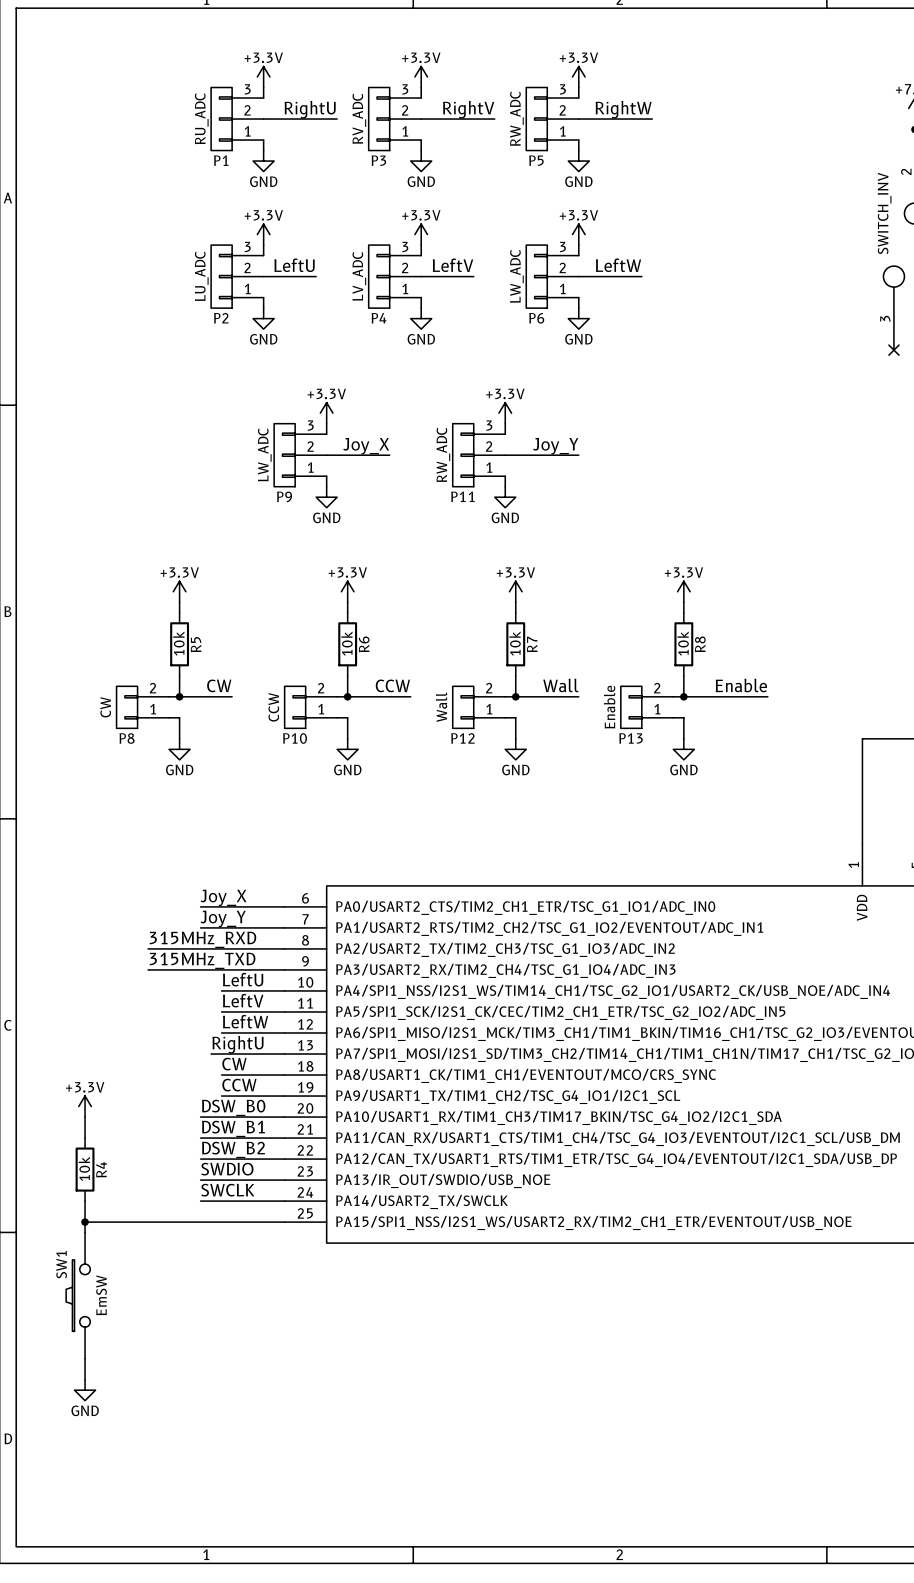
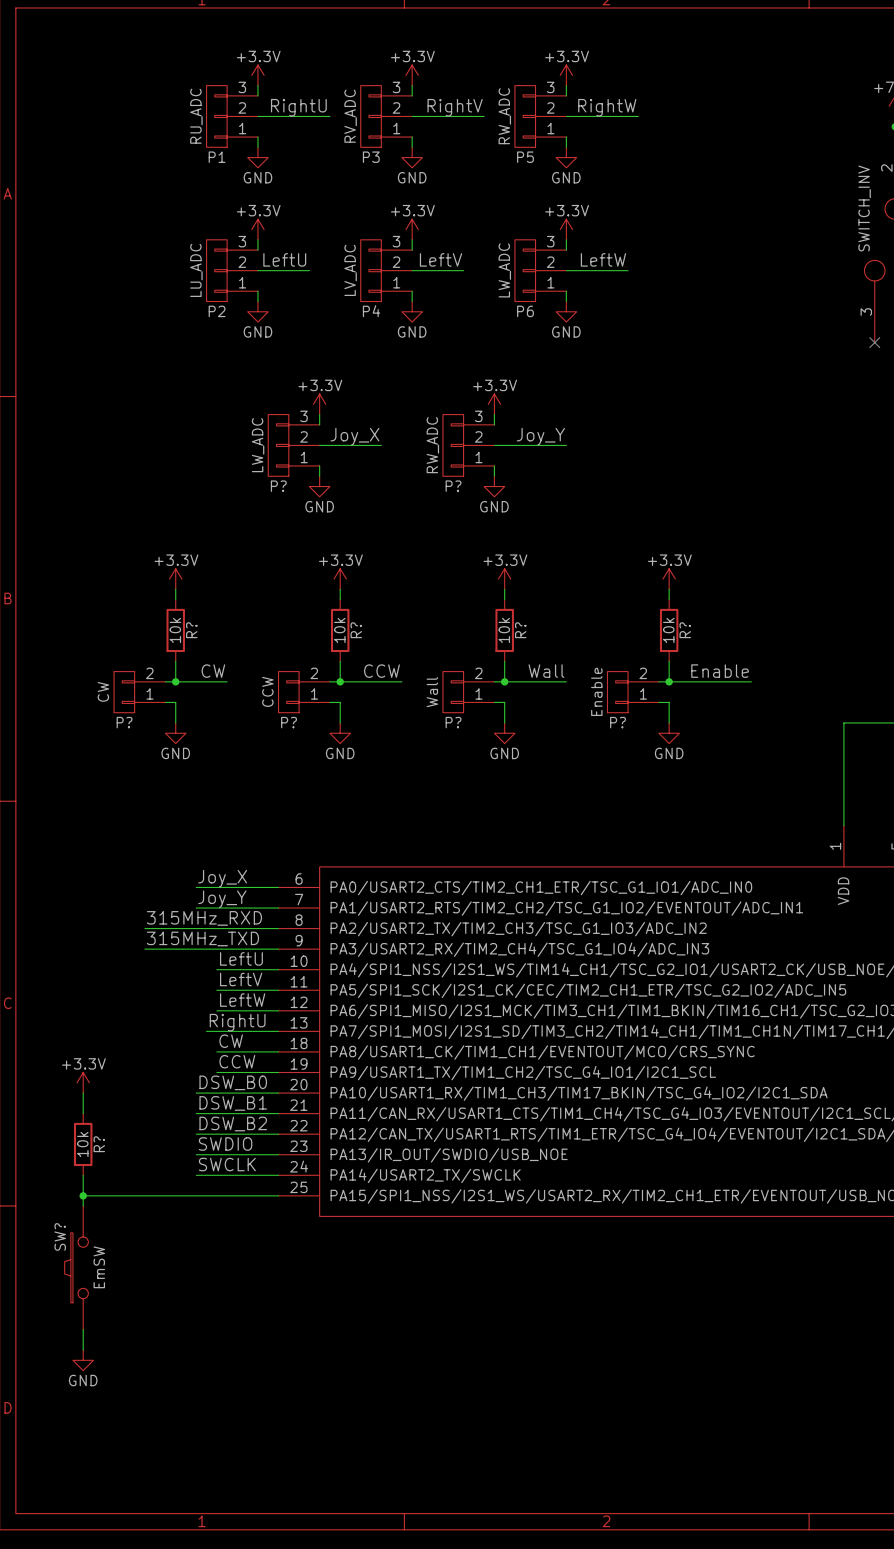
P9 name: P9 (284, 496) -> P? (278, 486)
P11 name: P11 (462, 496) -> P? (453, 486)
R5 name: R5 (196, 644) -> R? (191, 630)
R6 name: R6 (364, 644) -> R? (356, 630)
R7 name: R7 (532, 644) -> R? (520, 630)
R8 name: R8 (700, 644) -> R? (685, 630)
P8 name: P8 (127, 738) -> P? (124, 722)
P10 name: P10 (295, 738) -> P? (289, 722)
P12 name: P12 (462, 738) -> P? (453, 722)
P13 name: P13 (631, 738) -> P? (618, 722)
R4 name: R4 (101, 1169) -> R? (99, 1144)
SW1 name: SW1 (61, 1264) -> SW? (60, 1236)

